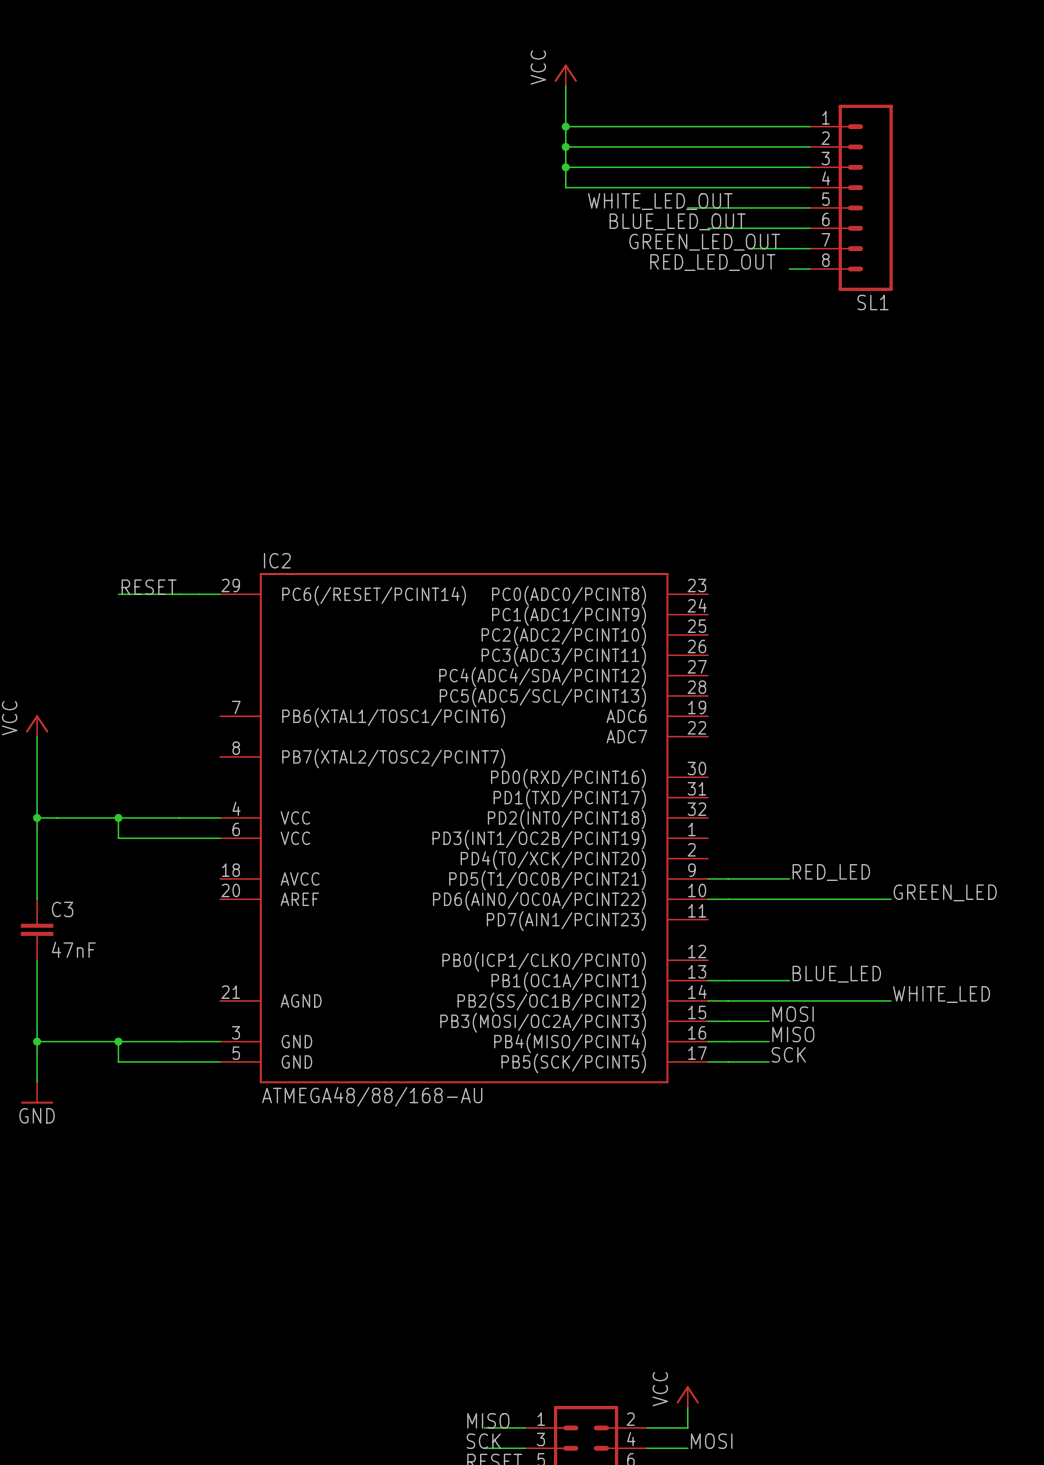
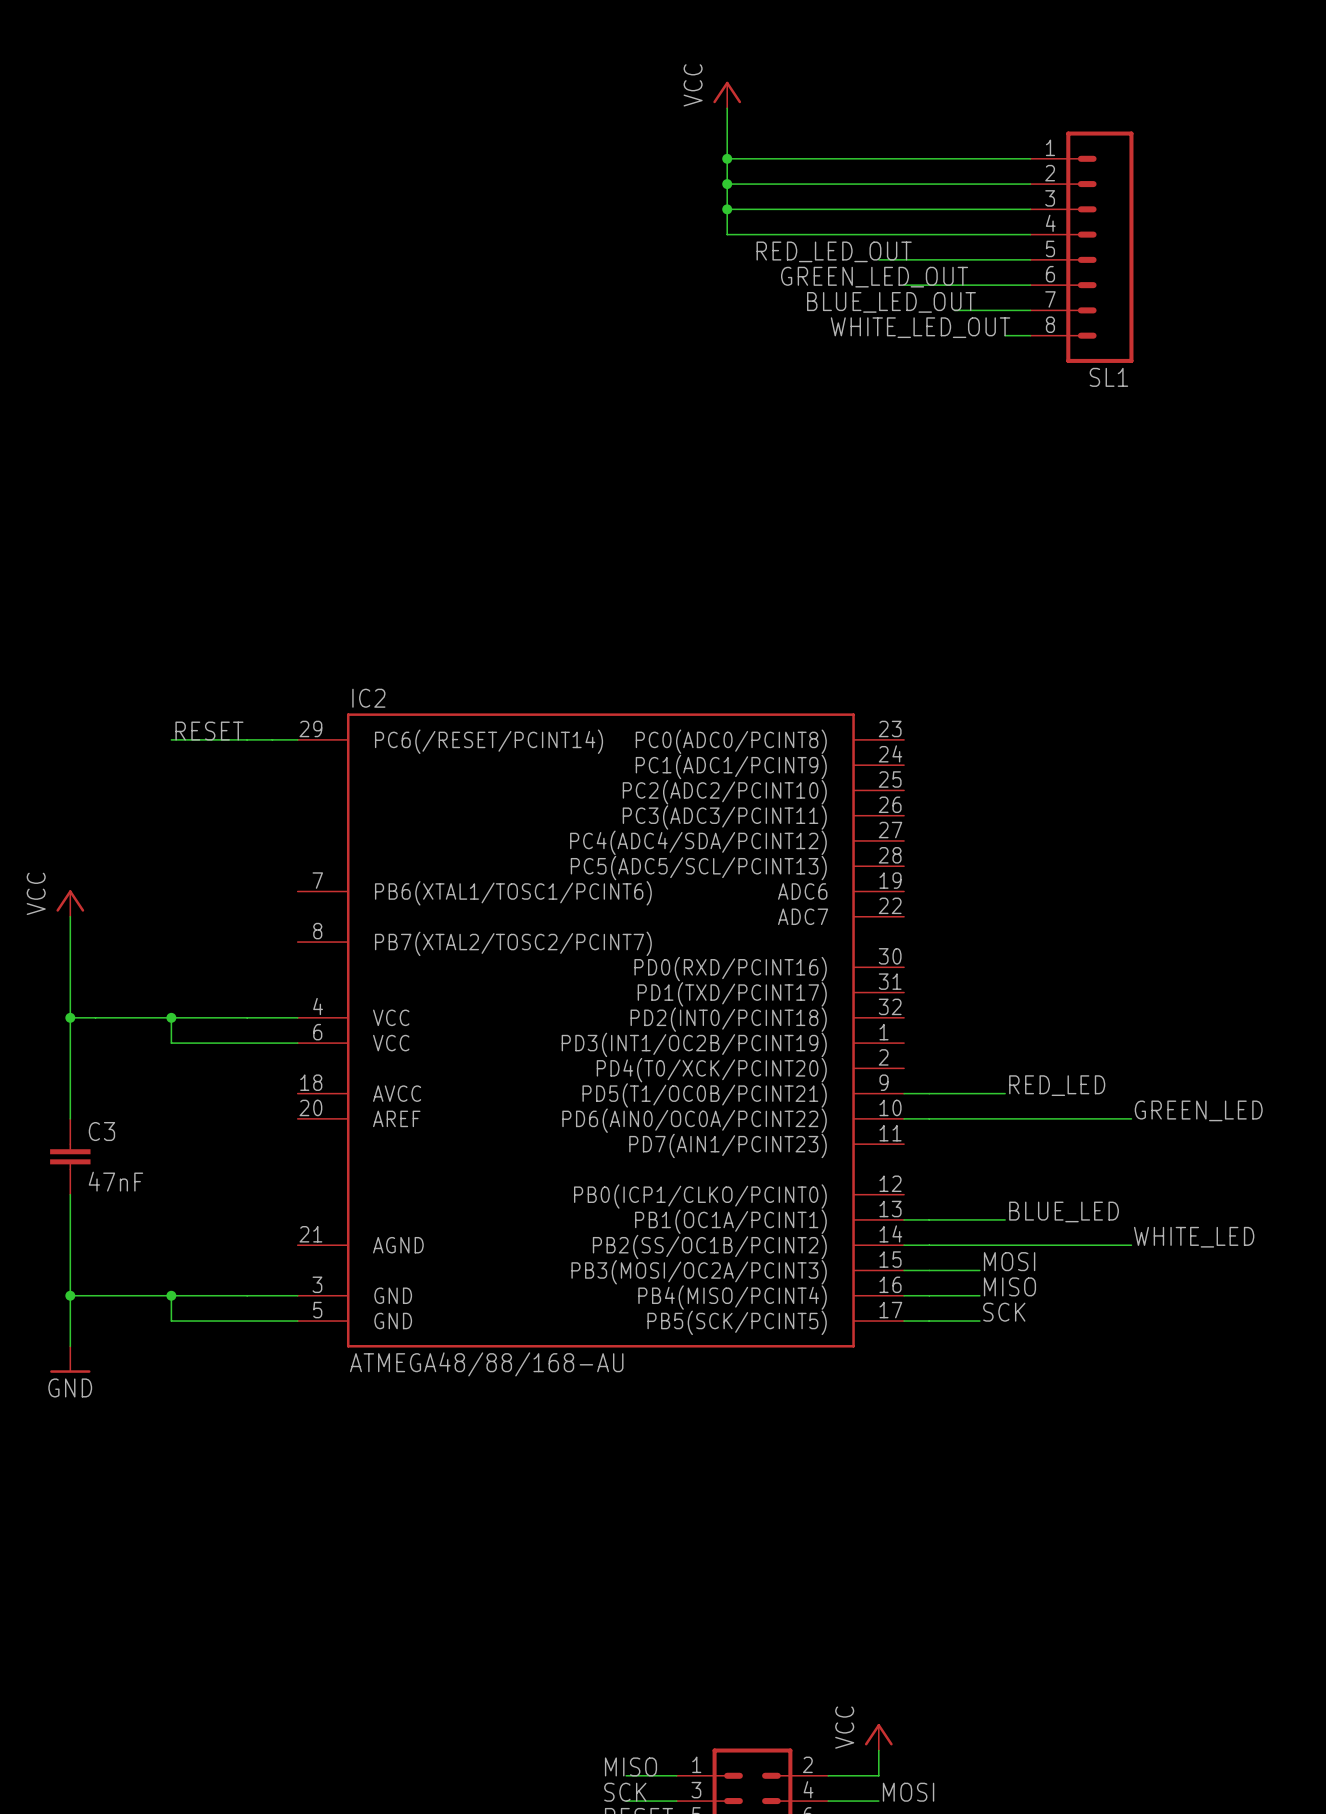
label: WHITE_LED_OUT (660, 201) -> RED_LED_OUT (834, 251)
label: BLUE_LED_OUT (677, 221) -> GREEN_LED_OUT (874, 277)
label: GREEN_LED_OUT (704, 242) -> BLUE_LED_OUT (891, 302)
label: RED_LED_OUT (712, 262) -> WHITE_LED_OUT (920, 327)

